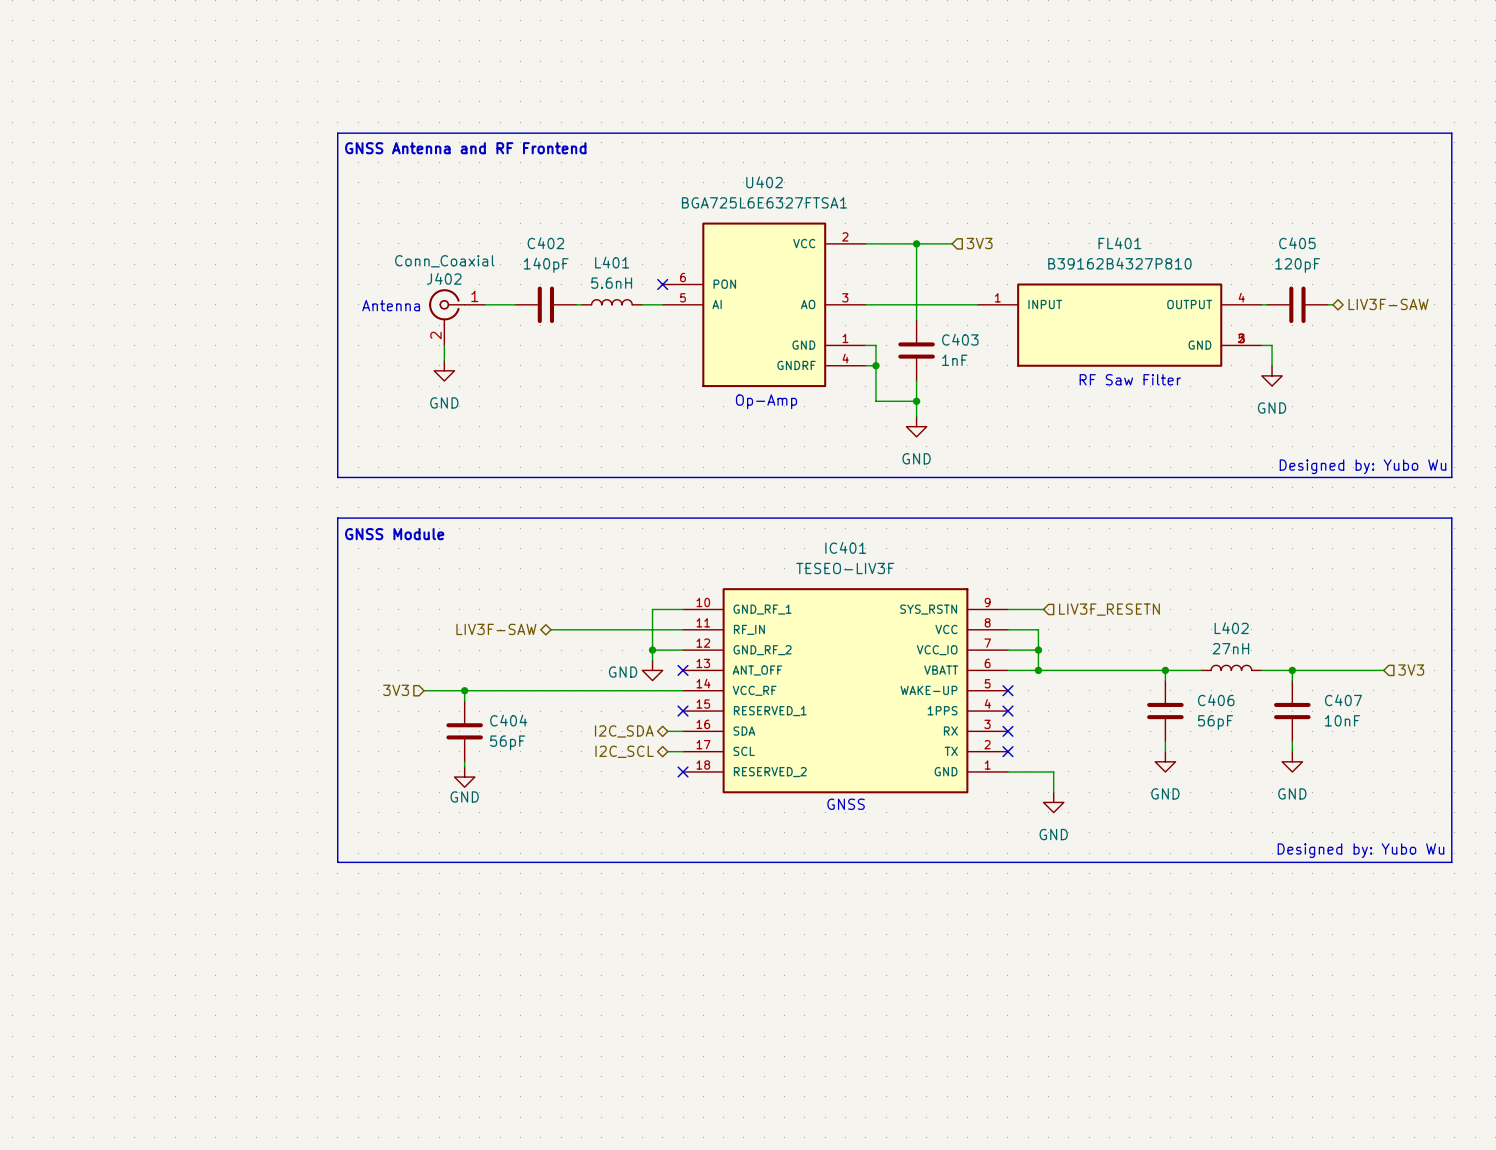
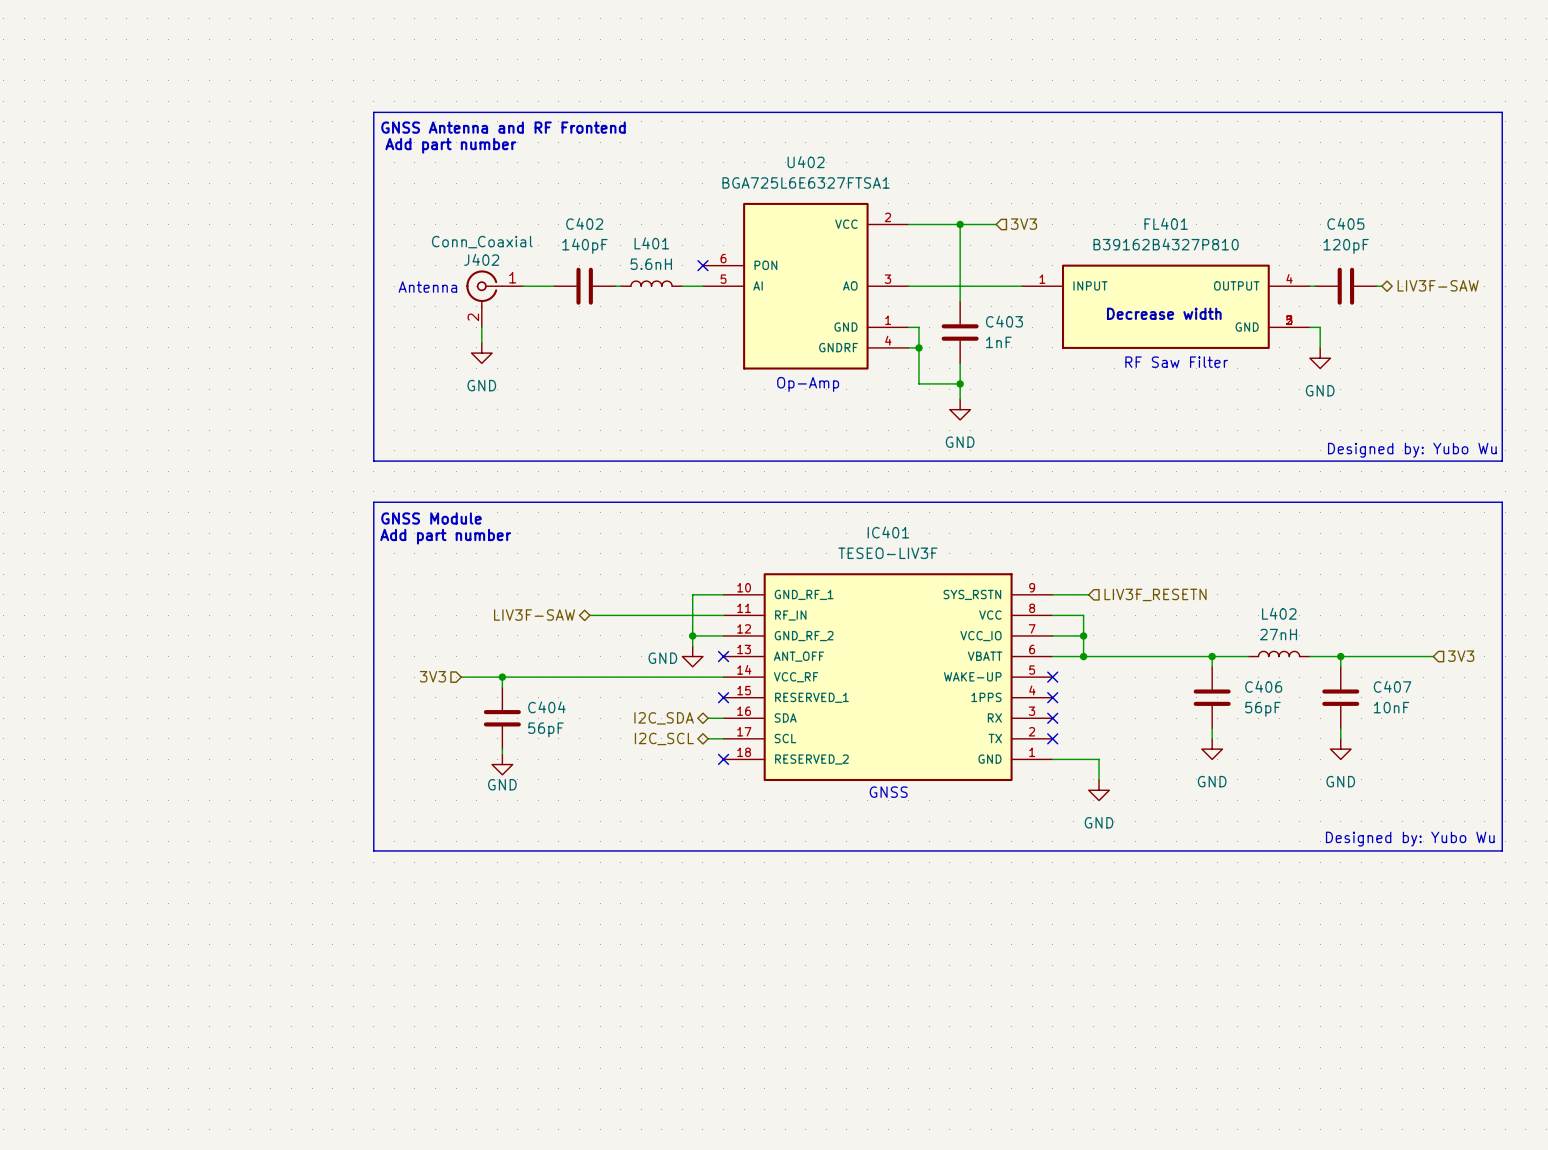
text: none -> Add part number (450, 145)
text: none -> Decrease width (1164, 313)
text: none -> Add part number (445, 536)

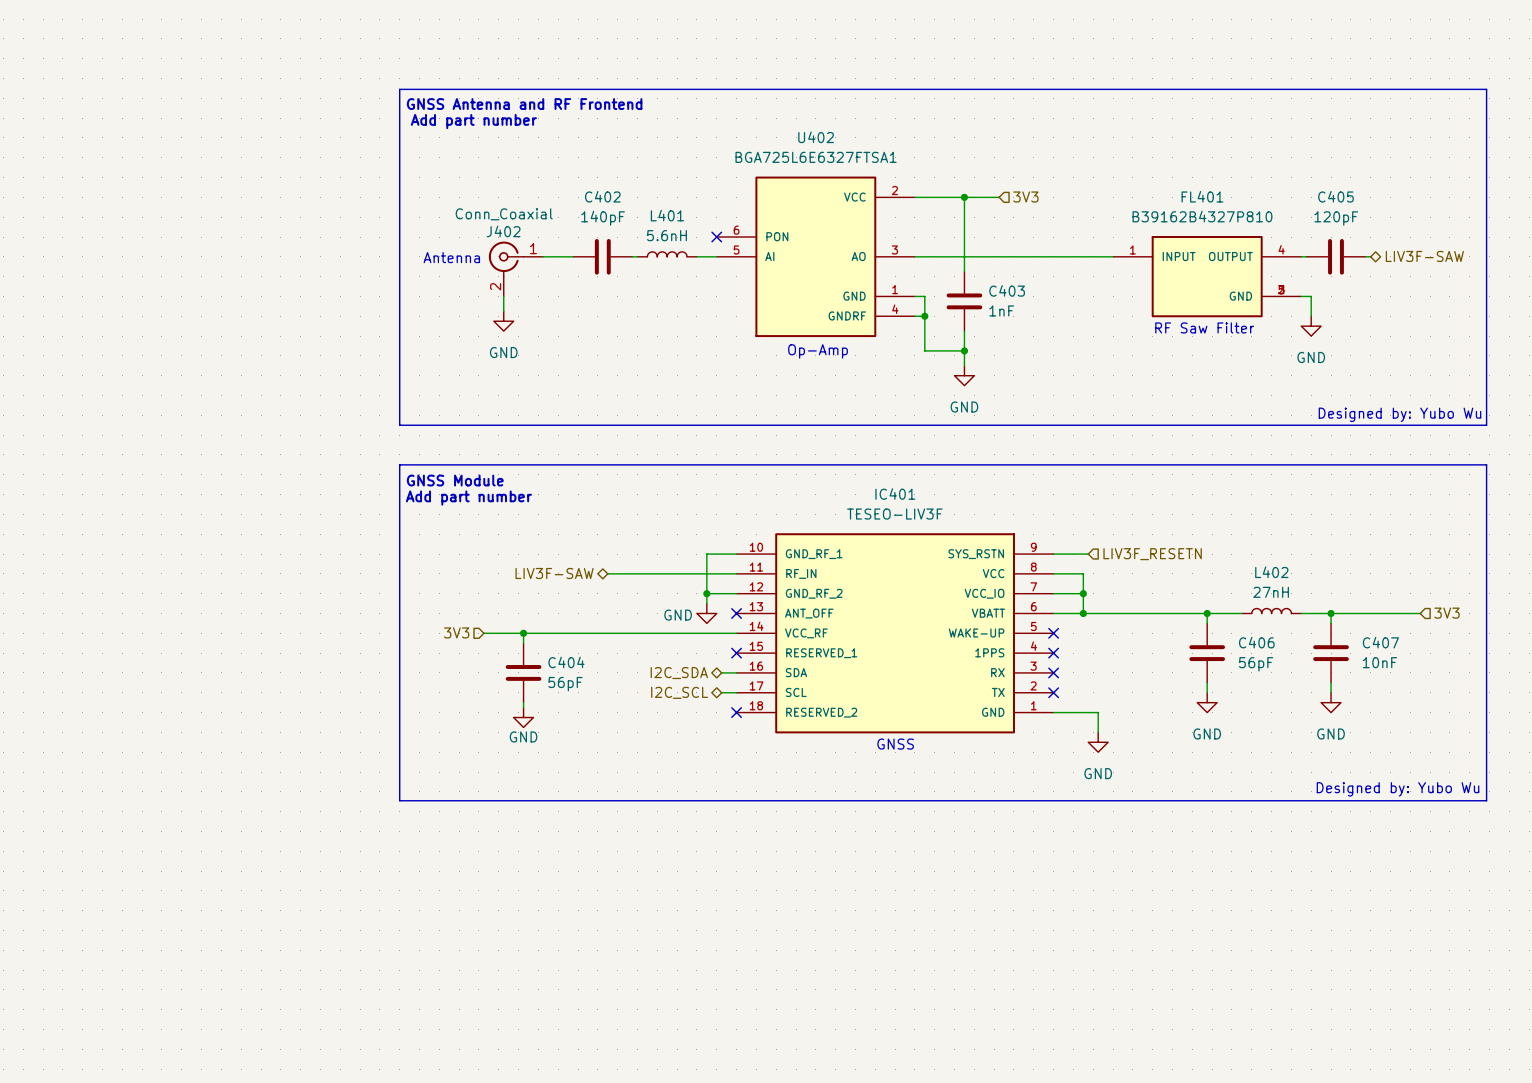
FL401 symbol: [1021, 264, 1310, 349] -> [1113, 236, 1302, 318]
text: Decrease width (1164, 313) -> none
text position: RF Saw Filter (1176, 362) -> RF Saw Filter (1204, 327)

